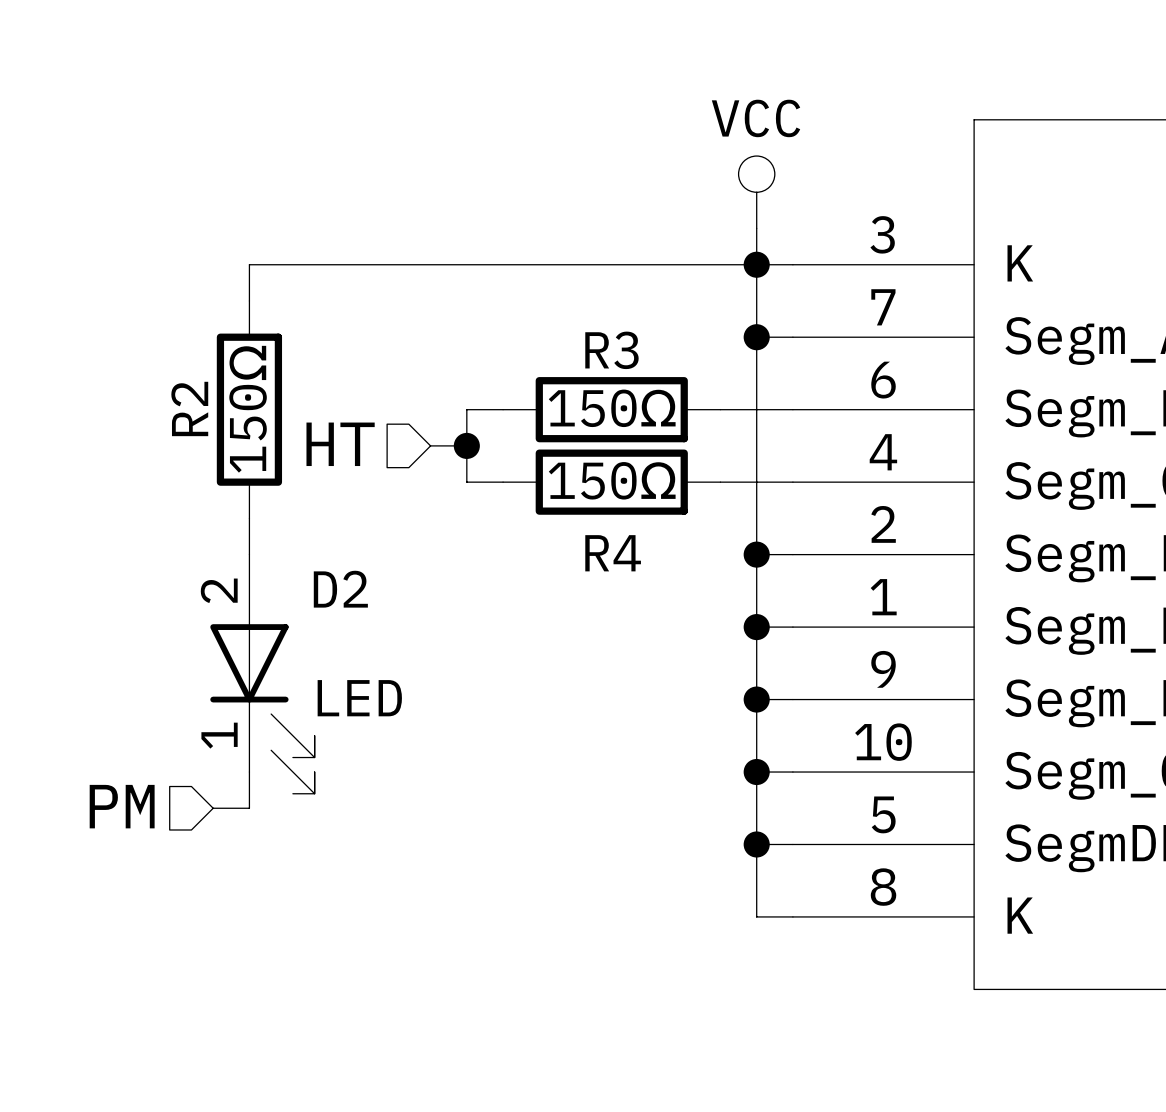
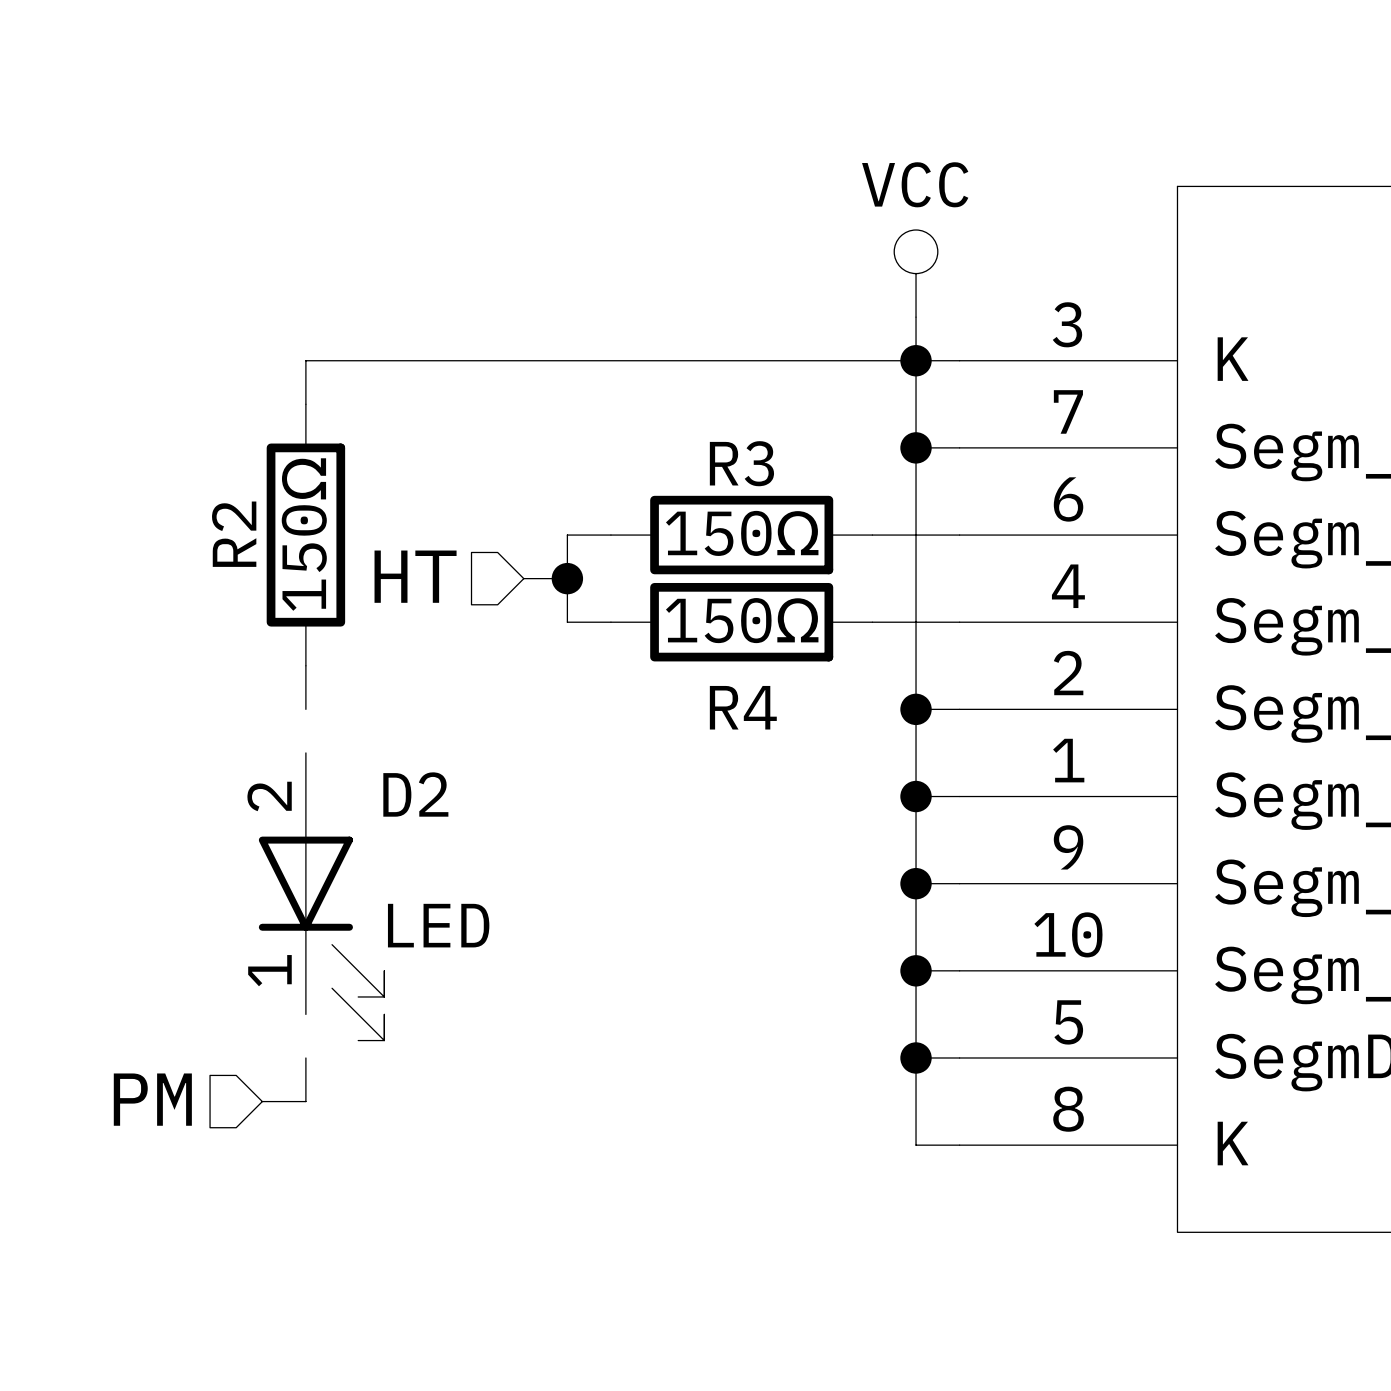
D2 position: (262, 674) -> (321, 896)
wire: (249, 772) (249, 808) (213, 808) -> (305, 1057) (305, 1101) (262, 1101)
hierarchical label position: PM (122, 806) -> PM (152, 1099)

